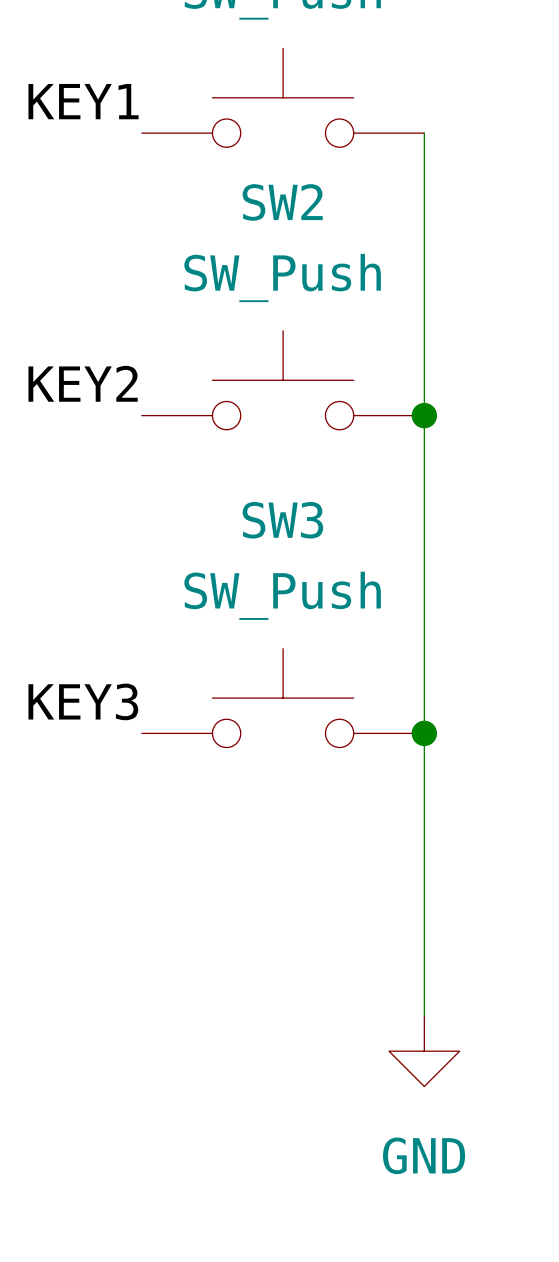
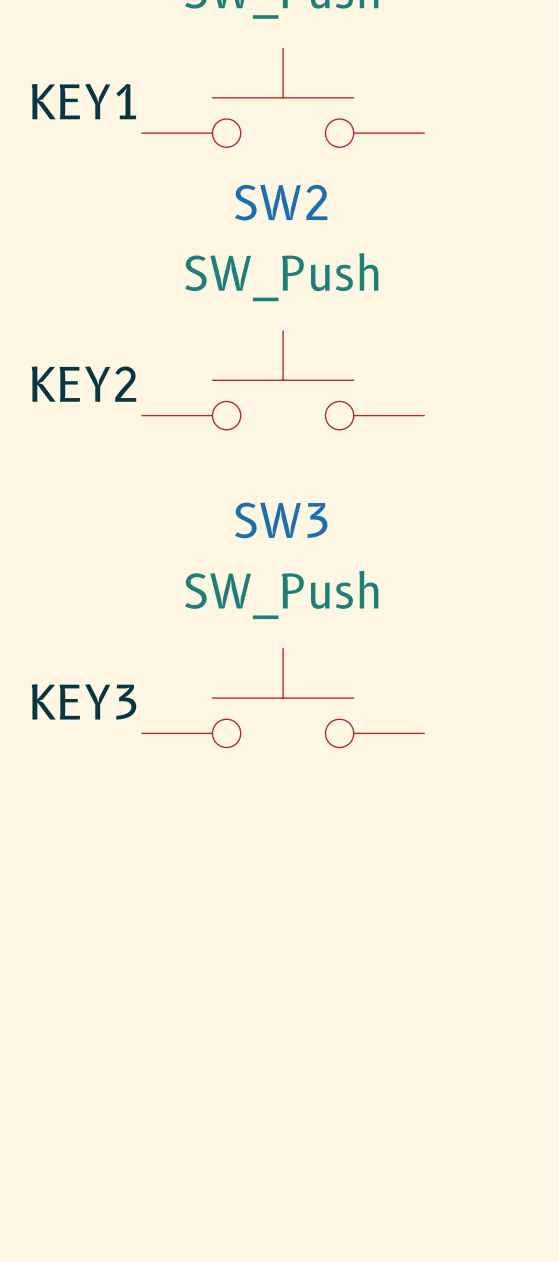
wire: (424, 133) (424, 1015) -> none
junction: (424, 415) -> none
junction: (424, 733) -> none
power symbol: GND (424, 1051) -> none

